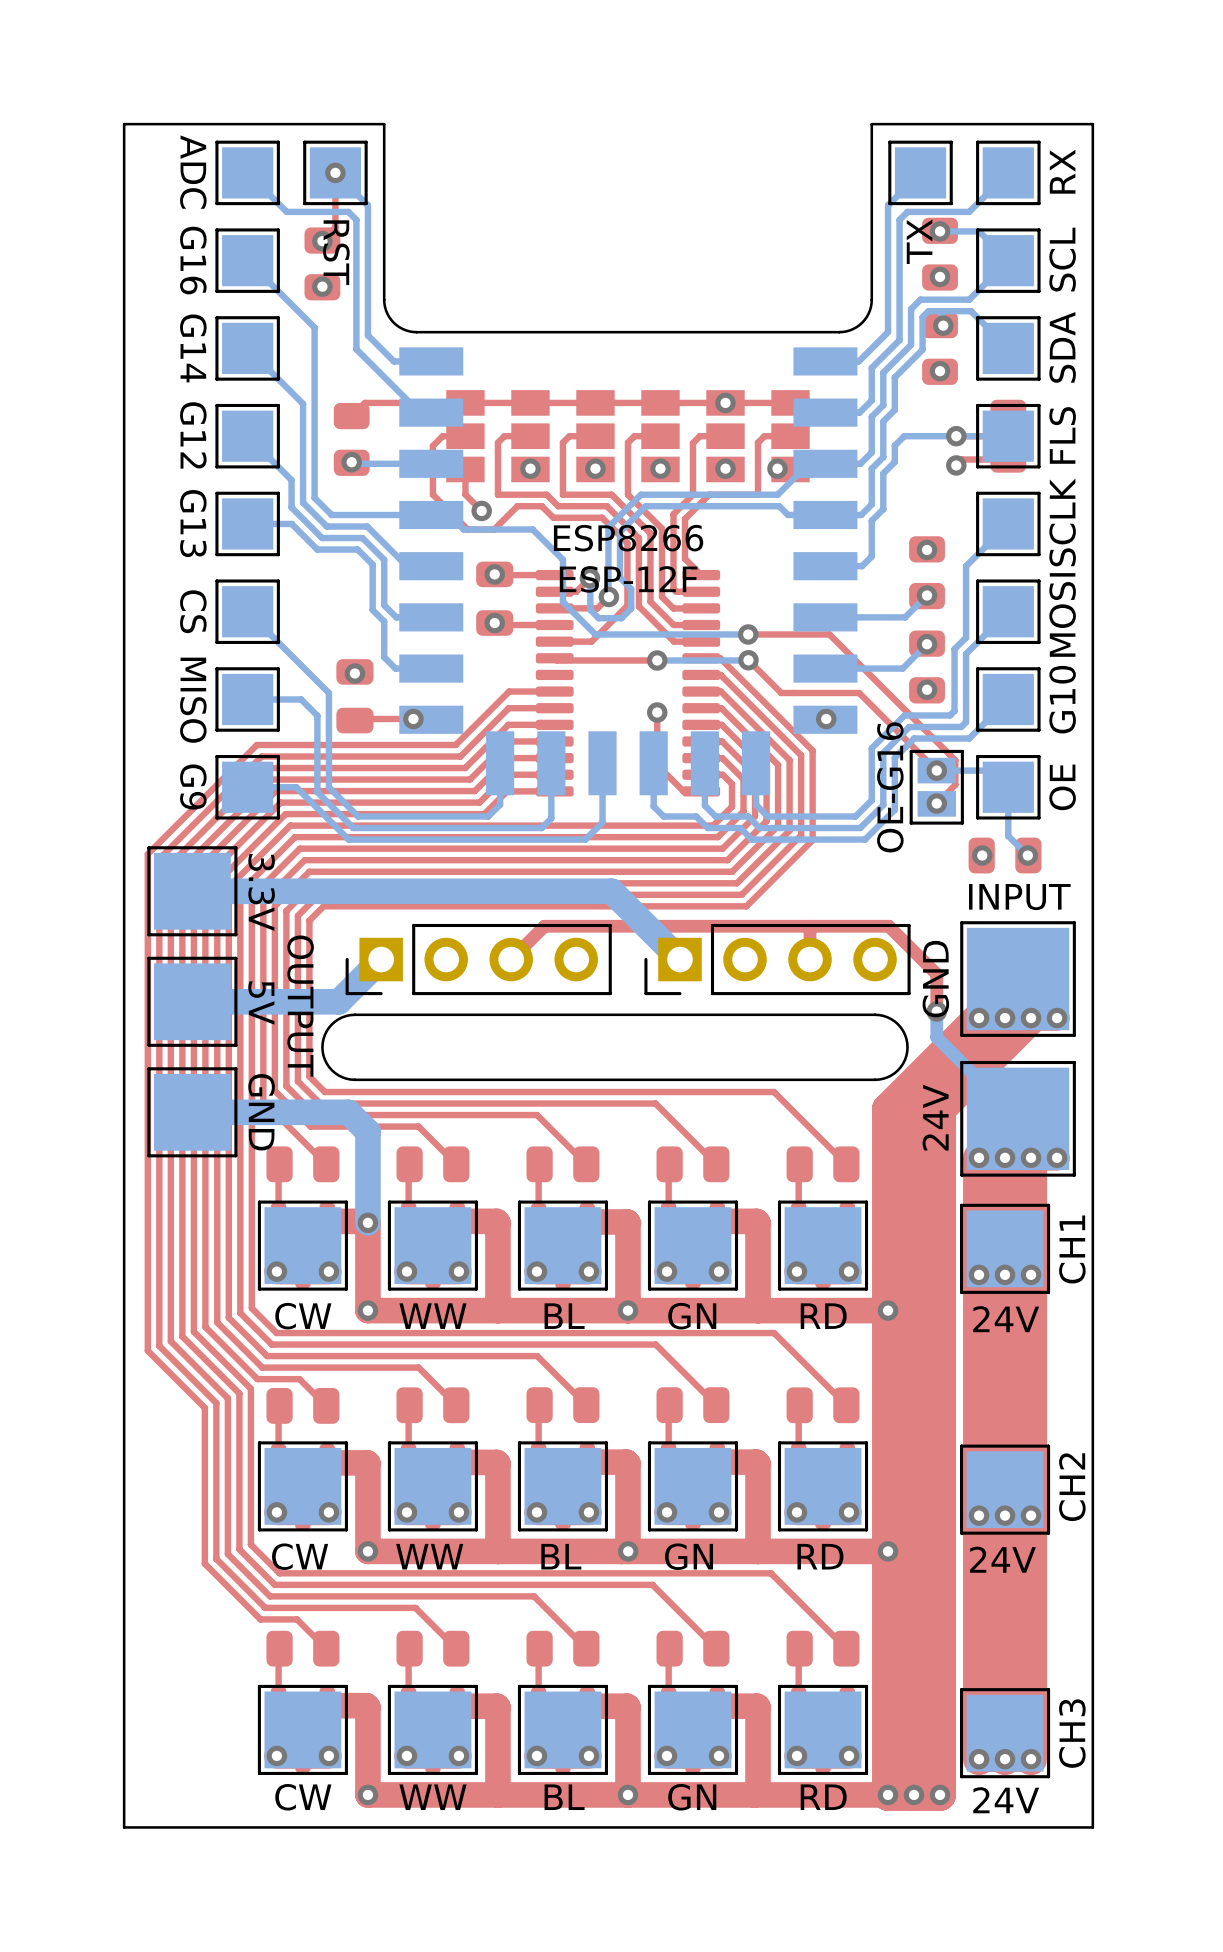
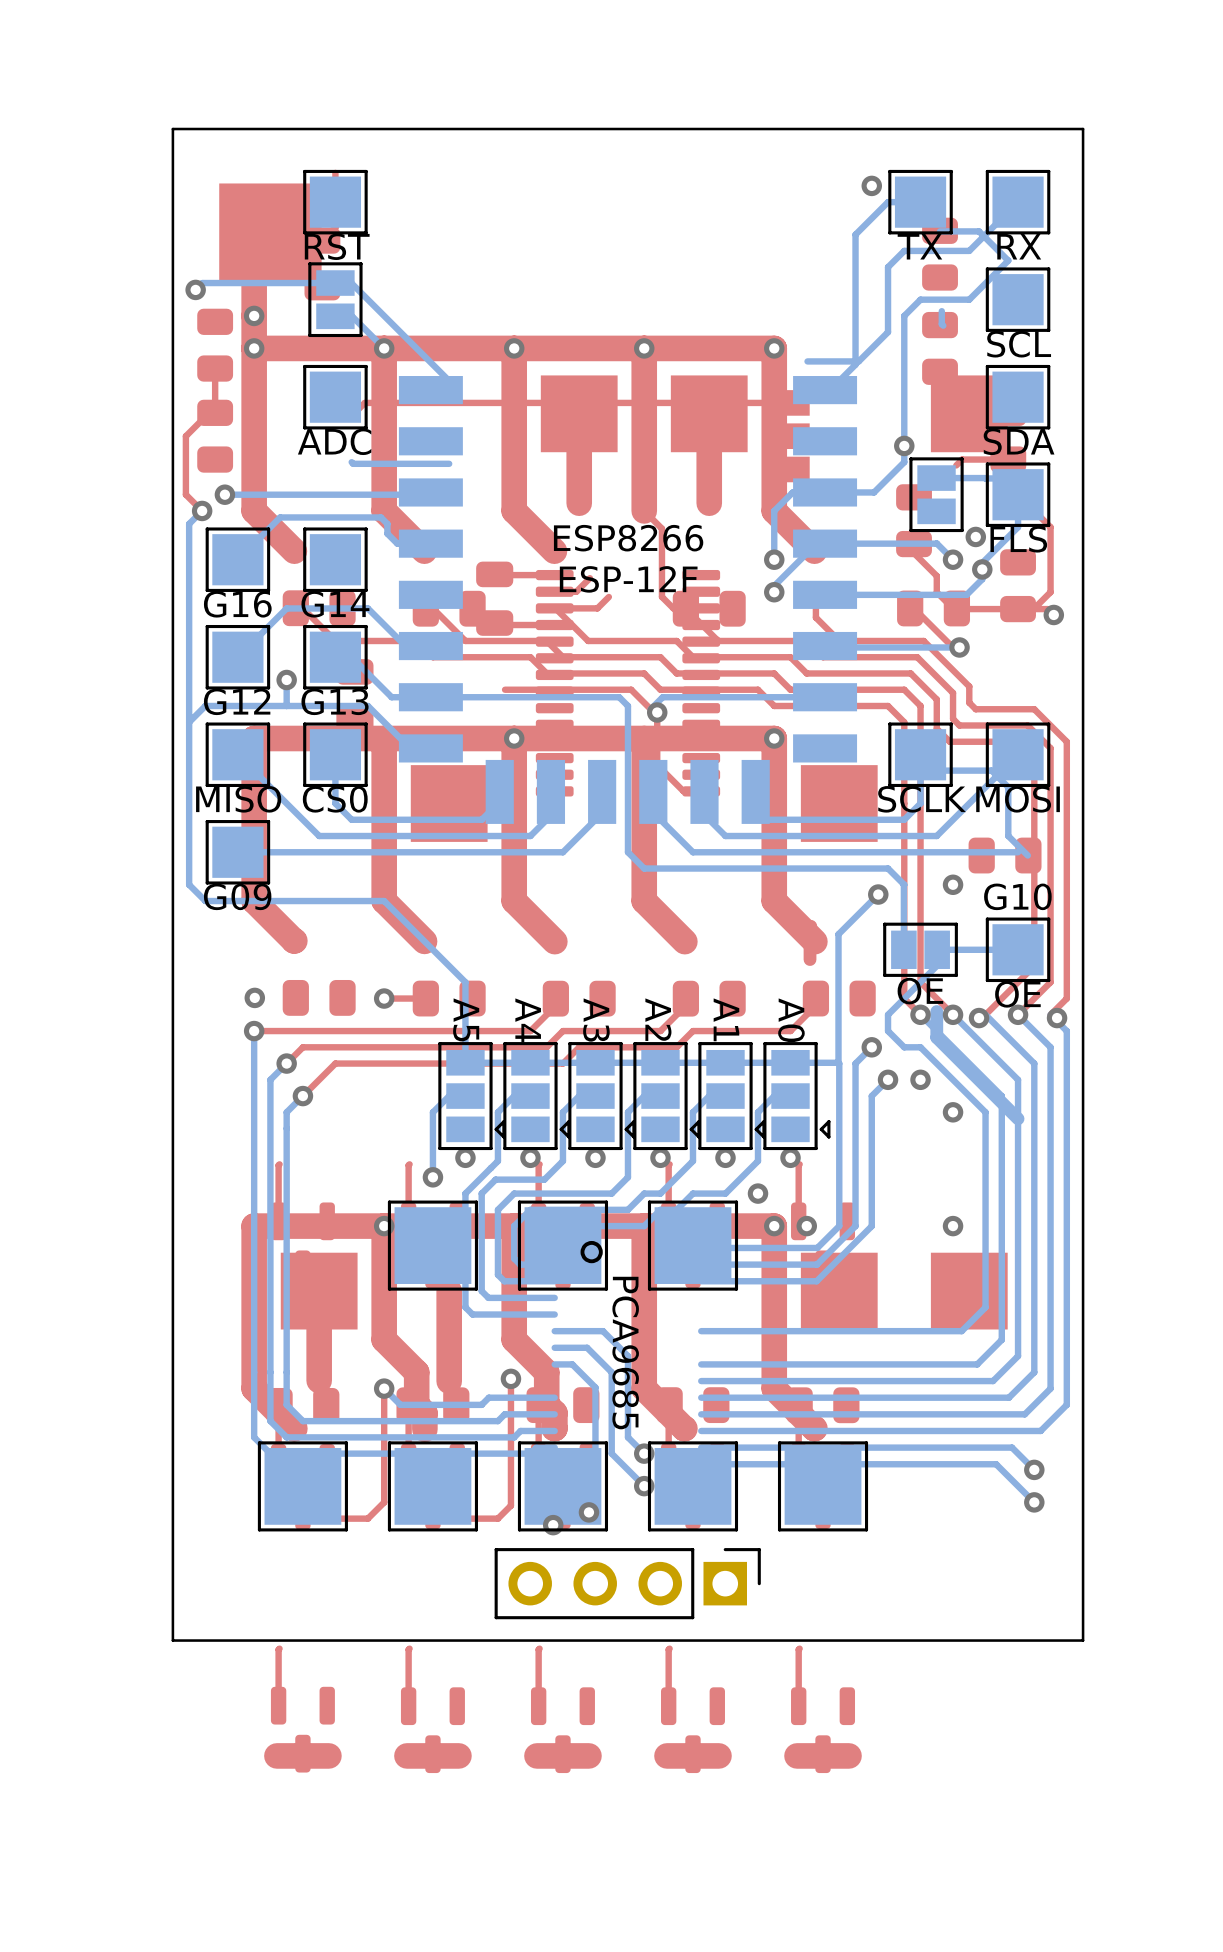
board edge: (1092, 124) (871, 124) (871, 303) (868, 313) (862, 322) (850, 330) (839, 332) (416, 332) (405, 330) (391, 319) (384, 303) (384, 124) (124, 124) (124, 1827) (1092, 1827) (1092, 124) -> (1083, 129) (1083, 1640) (172, 1640) (172, 129) (1083, 129)
text rotation: 0° (1062, 171) -> 90° clockwise (1019, 246)
text position: RX (1062, 171) -> RX (1019, 246)
text rotation: 0° (193, 172) -> 90° counterclockwise (334, 441)
text position: ADC (193, 172) -> ADC (334, 441)
bottom track: (247, 172) (286, 211) (348, 211) (356, 219) (356, 349) (419, 412) (449, 412) -> none
part: (247, 172) -> none
bottom track: (335, 172) (367, 205) (367, 335) (393, 361) (449, 361) -> none
part position: (335, 172) -> (335, 202)
via: (335, 172) -> none
bottom track: (920, 172) (888, 205) (888, 267) -> (1018, 202) (969, 250) (904, 250) (888, 267)
part position: (920, 172) -> (920, 202)
bottom track: (1008, 172) (969, 211) (907, 211) (899, 219) (899, 340) (871, 367) (871, 400) (859, 412) (807, 412) -> none
part: (1008, 172) -> none
via: none -> (871, 185)
bottom track: none -> (920, 202) (888, 202) (855, 234) (855, 364) (830, 390) (807, 390)
part: none -> (1018, 202)
via: (940, 231) -> none
top track: none -> (270, 234) (254, 250) (254, 510) (294, 551)
part: none -> (270, 234)
via: (322, 241) -> none
text rotation: 0° (919, 241) -> 90° clockwise (919, 246)
text rotation: 0° (336, 252) -> 90° counterclockwise (337, 246)
text rotation: 0° (1062, 259) -> 90° clockwise (1019, 344)
text position: SCL (1062, 259) -> SCL (1019, 344)
text rotation: 0° (193, 260) -> 90° counterclockwise (237, 604)
text position: G16 (193, 260) -> G16 (237, 604)
bottom track: (247, 260) (314, 327) (314, 497) (331, 515) (449, 515) (463, 529) (532, 529) (562, 559) (562, 601) (595, 634) (748, 634) -> none
part: (247, 260) -> none
part: (1008, 260) -> none
via: (940, 276) -> none
via: (322, 286) -> none
bottom track: none -> (195, 289) (202, 283) (351, 283) (448, 380) (448, 390)
via: none -> (195, 289)
part: none -> (335, 299)
part: none -> (1018, 299)
bottom track: (911, 309) (911, 344) (883, 372) (883, 405) (871, 416) (871, 452) (860, 463) (807, 463) (777, 494) (640, 494) (608, 527) (608, 596) -> (911, 309) (904, 315) (904, 462) (874, 492) (792, 492) (774, 510) (774, 559)
via: none -> (254, 315)
bottom track: none -> (335, 316) (352, 316) (384, 348)
via: (943, 325) -> none
part: none -> (215, 345)
text rotation: 0° (1062, 347) -> 90° clockwise (1019, 441)
text position: SDA (1062, 347) -> SDA (1019, 441)
text rotation: 0° (193, 348) -> 90° counterclockwise (335, 604)
text position: G14 (193, 348) -> G14 (335, 604)
bottom track: (247, 348) (303, 403) (303, 502) (326, 526) (367, 526) (406, 566) (449, 566) -> none
part: (247, 348) -> none
top track: none -> (254, 348) (774, 348) (774, 510) (814, 551)
via: none -> (254, 348)
top track: none -> (384, 348) (384, 510) (424, 551)
via: none -> (384, 348)
top track: none -> (514, 348) (514, 510) (554, 551)
via: none -> (514, 348)
via: none -> (644, 348)
via: none -> (774, 348)
bottom track: (1008, 348) (971, 311) (928, 311) (922, 317) (922, 349) (894, 377) (894, 409) (883, 421) (883, 457) (871, 468) (871, 504) (861, 515) (788, 515) (779, 506) (645, 506) (619, 531) (619, 577) (631, 588) (631, 608) (621, 618) (598, 618) (590, 609) (589, 578) -> none
part: (1008, 348) -> none
top track: none -> (215, 368) (215, 412) (209, 412) (185, 436) (185, 494) (202, 510)
via: (940, 371) -> none
part: none -> (335, 397)
part: none -> (1018, 397)
via: (725, 402) -> none
top track: none -> (579, 413) (579, 503)
part: none -> (579, 413)
top track: none -> (709, 413) (709, 503)
part: none -> (709, 413)
part: none -> (969, 413)
text rotation: 0° (193, 435) -> 90° counterclockwise (237, 701)
text position: G12 (193, 435) -> G12 (237, 701)
text rotation: 0° (1062, 435) -> 90° clockwise (1018, 539)
text position: FLS (1062, 435) -> FLS (1018, 539)
part: none -> (215, 436)
bottom track: (247, 436) (291, 480) (291, 507) (322, 538) (362, 538) (384, 559) (384, 605) (396, 617) (449, 617) -> none
part: (247, 436) -> none
top track: (465, 436) (442, 436) (432, 445) (432, 494) (467, 529) (494, 529) (517, 506) (541, 506) (553, 517) (602, 517) (627, 543) (627, 605) (591, 641) (554, 641) -> none
part: (465, 436) -> none
top track: (530, 436) (504, 436) (497, 442) (497, 494) (546, 494) (558, 506) (606, 506) (638, 538) (638, 606) (674, 641) (701, 641) -> none
part: (530, 436) -> none
top track: (595, 436) (569, 436) (562, 442) (562, 494) (611, 494) (650, 533) (650, 601) (673, 625) (701, 625) -> none
part: (595, 436) -> none
top track: (660, 436) (634, 436) (627, 442) (627, 494) (644, 510) -> (644, 348) (644, 510)
part: (660, 436) -> none
top track: (725, 436) (699, 436) (692, 443) (692, 494) (673, 514) (673, 588) (676, 591) (701, 591) -> none
part: (725, 436) -> none
top track: (790, 436) (764, 436) (758, 442) (758, 494) (709, 494) (685, 518) (685, 558) (701, 575) -> none
via: (956, 436) -> none
bottom track: (1008, 436) (904, 436) (894, 445) (894, 461) (883, 473) (883, 509) (871, 520) (871, 556) (862, 566) (807, 566) -> none
part: (1008, 436) -> none
part: (351, 439) -> none
via: none -> (904, 445)
via: (351, 462) -> none
via: (956, 465) -> none
via: (530, 468) -> none
via: (595, 468) -> none
via: (660, 468) -> none
via: (725, 468) -> none
via: (777, 468) -> none
top track: (465, 469) (465, 494) (481, 510) -> none
bottom track: none -> (936, 478) (1001, 478) (1018, 494) (1018, 527) (982, 562) (982, 579) (966, 594) (807, 594)
bottom track: none -> (448, 492) (446, 494) (224, 494)
via: none -> (224, 494)
part: none -> (936, 494)
part: none -> (1018, 494)
top track: none -> (1012, 497) (1021, 497) (1050, 527) (1050, 592) (1033, 609)
bottom track: none -> (202, 510) (189, 523) (189, 884) (205, 901) (384, 901) (465, 982) (465, 1062) (838, 1062)
via: none -> (202, 510)
via: (481, 510) -> none
part: none -> (914, 520)
text rotation: 0° (1062, 522) -> 90° clockwise (922, 799)
text position: SCLK (1062, 522) -> SCLK (922, 799)
text rotation: 0° (193, 523) -> 90° counterclockwise (335, 701)
text position: G13 (193, 523) -> G13 (335, 701)
bottom track: (247, 523) (291, 523) (317, 549) (357, 549) (372, 564) (372, 609) (384, 621) (384, 657) (395, 668) (449, 668) -> none
part: (247, 523) -> none
bottom track: (1008, 523) (966, 566) (966, 637) (954, 649) (954, 711) (950, 715) (904, 715) (871, 748) (871, 800) (855, 816) (767, 816) (756, 804) (756, 745) -> none
part: (1008, 523) -> none
via: none -> (975, 536)
bottom track: none -> (448, 543) (397, 543) (387, 533) (387, 523) (380, 517) (280, 517) (237, 559)
top track: none -> (914, 544) (914, 553) (936, 575) (936, 592) (953, 608) (1047, 609) (1053, 614)
via: (927, 549) -> none
part: none -> (237, 559)
part: none -> (335, 559)
via: none -> (774, 559)
bottom track: none -> (953, 559) (936, 543) (807, 543) (807, 553) (774, 585) (774, 592)
via: none -> (953, 559)
via: none -> (982, 569)
part position: (628, 571) -> (627, 599)
part: (927, 572) -> none
via: (494, 574) -> none
via: (589, 578) -> none
part: none -> (1018, 585)
via: none -> (774, 592)
bottom track: (927, 595) (905, 617) (807, 617) -> none
via: (927, 595) -> none
via: (608, 596) -> none
top track: none -> (295, 608) (302, 608) (335, 640) (416, 640) (432, 657) (530, 657) (546, 673) (644, 673) (660, 689) (758, 689) (774, 705) (888, 705) (904, 722) (904, 998) (920, 1014)
part: none -> (319, 608)
top track: none -> (425, 608) (433, 608) (465, 640) (546, 640) (562, 657) (660, 657) (676, 673) (774, 673) (790, 689) (904, 689) (920, 705) (920, 982) (953, 1014)
part: none -> (449, 608)
top track: none -> (555, 608) (588, 640) (676, 640) (692, 657) (790, 657) (806, 673) (910, 673) (936, 699) (936, 728) (949, 741) (1024, 741) (1034, 751) (1034, 966) (985, 1014)
top track: none -> (685, 608) (718, 640) (806, 640) (823, 657) (917, 657) (953, 692) (953, 718) (959, 725) (1027, 725) (1050, 748) (1050, 982) (1018, 1014)
part: none -> (709, 608)
top track: none -> (815, 608) (815, 617) (839, 640) (923, 640) (969, 686) (969, 702) (975, 709) (1034, 709) (1066, 741) (1066, 998) (1050, 1014)
top track: none -> (910, 608) (914, 608) (949, 644) (956, 644) (959, 647)
part: none -> (933, 608)
text: CS (193, 611) -> none
bottom track: (247, 611) (328, 692) (328, 787) (358, 816) (488, 816) (500, 804) (500, 745) -> none
part: (247, 611) -> none
bottom track: (1008, 611) (966, 653) (966, 722) (961, 726) (909, 726) (883, 753) (883, 805) (860, 828) (759, 828) (748, 816) (715, 816) (704, 805) (704, 745) -> none
part: (1008, 611) -> none
via: none -> (1053, 614)
text rotation: 0° (1062, 614) -> 90° clockwise (1018, 799)
text position: MOSI (1062, 614) -> MOSI (1018, 799)
via: (494, 623) -> none
top track: (748, 634) (829, 634) (955, 760) (955, 784) (936, 803) -> none
via: (748, 634) -> none
bottom track: (927, 644) (902, 668) (807, 668) -> none
via: (927, 644) -> none
bottom track: none -> (448, 646) (405, 646) (367, 608) (286, 608) (237, 657)
bottom track: none -> (807, 646) (959, 647)
via: none -> (959, 647)
part: none -> (237, 657)
bottom track: none -> (335, 657) (351, 657) (391, 697) (619, 697) (627, 705) (627, 852) (644, 868) (888, 868) (904, 884) (903, 949)
part: none -> (335, 657)
top track: (554, 658) (556, 660) (657, 660) -> none
top track: (701, 658) (720, 658) (812, 750) (812, 840) (746, 906) (323, 906) (309, 920) (309, 1076) (324, 1092) (774, 1092) (846, 1164) -> none
via: (657, 660) -> none
top track: (748, 660) (781, 692) (859, 692) (936, 770) -> none
bottom track: (748, 660) (657, 660) -> none
via: (748, 660) -> none
part: (927, 666) -> none
via: (354, 673) -> none
top track: (701, 674) (720, 674) (801, 755) (801, 835) (741, 894) (318, 894) (297, 915) (297, 1081) (320, 1103) (655, 1103) (716, 1164) -> none
bottom track: none -> (286, 679) (286, 705)
via: none -> (286, 679)
top track: none -> (505, 689) (631, 689) (650, 709)
via: (927, 689) -> none
top track: (554, 691) (509, 691) (455, 745) (256, 745) (147, 854) (147, 1350) (204, 1407) (204, 1563) (260, 1619) (297, 1619) (326, 1648) -> none
top track: (701, 691) (720, 691) (789, 760) (789, 830) (736, 883) (314, 883) (286, 910) (286, 1086) (315, 1115) (537, 1115) (586, 1164) -> none
bottom track: none -> (807, 697) (662, 697) (650, 709)
bottom track: (247, 699) (301, 699) (317, 715) (317, 792) (353, 828) (541, 828) (551, 818) (551, 745) -> none
part: (247, 699) -> none
bottom track: (1008, 699) (969, 738) (914, 738) (894, 757) (894, 809) (865, 839) (751, 839) (740, 828) (707, 828) (696, 816) (663, 816) (653, 806) (653, 745) -> none
part: (1008, 699) -> none
text: G10 (1062, 699) -> none
text rotation: 0° (193, 700) -> 90° counterclockwise (238, 799)
top track: (554, 708) (508, 708) (460, 756) (261, 756) (159, 858) (159, 1346) (216, 1403) (216, 1558) (265, 1607) (415, 1607) (456, 1648) -> none
top track: (701, 708) (721, 708) (778, 764) (778, 825) (732, 871) (309, 871) (274, 906) (274, 1090) (310, 1126) (418, 1126) (456, 1164) -> none
top track: (413, 718) (356, 718) (354, 720) -> none
via: (413, 718) -> none
via: (826, 718) -> none
bottom track: none -> (189, 722) (205, 705) (367, 705) (410, 748) (448, 748)
top track: (554, 724) (508, 724) (465, 768) (266, 768) (170, 863) (170, 1341) (227, 1398) (227, 1554) (270, 1596) (534, 1596) (586, 1648) -> none
top track: (701, 724) (721, 724) (766, 769) (766, 821) (727, 860) (304, 860) (263, 901) (263, 1101) (326, 1164) -> none
top track: none -> (384, 738) (384, 901) (424, 941)
top track: none -> (514, 738) (514, 901) (554, 941)
via: none -> (514, 738)
top track: none -> (644, 738) (644, 901) (684, 941)
via: none -> (774, 738)
top track: (554, 741) (508, 741) (470, 779) (271, 779) (182, 868) (182, 1336) (239, 1393) (239, 1549) (274, 1584) (652, 1584) (716, 1648) -> none
top track: (701, 741) (722, 741) (755, 774) (755, 816) (722, 848) (299, 848) (251, 896) (251, 1308) (276, 1333) (774, 1333) (846, 1405) -> none
bottom track: (602, 745) (602, 822) (585, 839) (348, 839) (296, 787) (247, 787) -> none
bottom track: none -> (237, 754) (319, 836) (530, 836) (550, 815) (550, 774)
part: none -> (237, 754)
bottom track: none -> (335, 754) (335, 803) (351, 819) (481, 819) (499, 801) (499, 774)
part: none -> (335, 754)
bottom track: none -> (920, 754) (920, 803) (904, 819) (758, 819) (755, 817) (755, 774)
part: none -> (920, 754)
bottom track: none -> (1018, 754) (936, 836) (725, 836) (704, 815) (704, 774)
part: none -> (1018, 754)
top track: (554, 758) (507, 758) (474, 791) (275, 791) (193, 873) (193, 1331) (250, 1388) (250, 1544) (279, 1573) (771, 1573) (846, 1648) -> none
top track: (701, 758) (722, 758) (743, 779) (743, 811) (717, 837) (295, 837) (240, 891) (240, 1313) (271, 1344) (655, 1344) (716, 1405) -> none
via: (936, 770) -> none
top track: (554, 774) (507, 774) (479, 802) (280, 802) (205, 877) (205, 1327) (257, 1379) (299, 1379) (326, 1405) -> none
bottom track: none -> (602, 774) (602, 813) (562, 852) (237, 852)
bottom track: none -> (653, 774) (653, 812) (692, 852) (1018, 852)
top track: (701, 774) (722, 774) (732, 784) (732, 806) (713, 825) (290, 825) (228, 887) (228, 1317) (267, 1356) (537, 1356) (586, 1405) -> none
text: G9 (193, 787) -> none
part: (247, 787) -> none
text: OE-G16 (890, 787) -> none
part: (936, 787) -> none
part: (1008, 787) -> none
text: OE (1062, 787) -> none
top track: (554, 791) (507, 791) (484, 814) (285, 814) (217, 882) (217, 1322) (262, 1367) (418, 1367) (456, 1405) -> none
text: none -> CS0 (335, 799)
part: none -> (449, 803)
part: none -> (839, 803)
via: (936, 803) -> none
part: none -> (237, 852)
via: (982, 855) -> none
via: (1027, 855) -> none
via: none -> (953, 884)
bottom track: (192, 891) (611, 891) (679, 959) -> none
part: (192, 891) -> none
text: 3.3V (261, 892) -> G09 (237, 896)
bottom track: none -> (878, 894) (838, 934) (838, 1062)
via: none -> (878, 894)
text: INPUT (1019, 897) -> G10 (1017, 896)
top track: none -> (294, 940) (254, 901) (254, 738) (774, 738) (774, 901) (814, 941)
part: none -> (920, 949)
bottom track: none -> (1018, 949) (937, 949) (937, 965) (888, 1014) (888, 1031) (904, 1047) (920, 1047) (985, 1112) (985, 1307) (961, 1331) (701, 1331)
part: none -> (1018, 949)
bottom track: (381, 959) (338, 1001) (192, 1001) -> none
part: (478, 959) -> none
top track: (511, 959) (544, 926) (888, 926) (936, 974) (936, 1011) -> none
part: (777, 959) -> none
text: GND (935, 979) -> OE (920, 991)
part: (1018, 979) -> none
text: none -> OE (1017, 994)
via: none -> (254, 997)
part: none -> (319, 997)
via: none -> (384, 998)
top track: none -> (425, 998) (384, 998)
part: none -> (449, 998)
top track: none -> (555, 998) (555, 1005) (530, 1031) (254, 1031)
part: none -> (579, 998)
top track: none -> (685, 998) (685, 1005) (660, 1031) (562, 1031) (546, 1047) (302, 1047) (286, 1063)
part: none -> (709, 998)
top track: none -> (815, 998) (815, 1005) (790, 1031) (692, 1031) (676, 1047) (579, 1047) (562, 1063) (335, 1063) (302, 1096)
part: none -> (839, 998)
part: (192, 1001) -> none
text: 5V (261, 1003) -> none
text: OUTPUT (300, 1006) -> none
via: (936, 1011) -> none
board edge: (875, 1014) (354, 1014) (342, 1017) (331, 1024) (324, 1034) (322, 1047) (324, 1059) (331, 1070) (342, 1077) (354, 1079) (875, 1079) (887, 1077) (898, 1070) (905, 1059) (907, 1047) (905, 1034) (898, 1024) (887, 1017) (875, 1014) -> none
bottom track: none -> (920, 1014) (1001, 1096) (1001, 1339) (977, 1364) (701, 1364)
via: none -> (920, 1014)
bottom track: none -> (953, 1014) (1018, 1079) (1018, 1356) (993, 1381) (701, 1381)
via: none -> (953, 1014)
bottom track: none -> (985, 1014) (1034, 1063) (1034, 1372) (1008, 1397) (701, 1397)
bottom track: none -> (1018, 1014) (1050, 1047) (1050, 1388) (1024, 1414) (701, 1414)
via: none -> (1018, 1014)
bottom track: none -> (1050, 1014) (1066, 1031) (1066, 1404) (1040, 1430) (701, 1430)
top track: (1005, 1018) (914, 1109) (914, 1794) -> none
via: (1005, 1018) -> none
top track: (1031, 1018) (940, 1109) (940, 1794) (888, 1794) -> none
via: (1031, 1018) -> none
top track: (1057, 1018) (979, 1018) (888, 1109) (888, 1794) -> none
text: none -> A5 (466, 1019)
text: none -> A2 (658, 1019)
text: none -> A1 (726, 1019)
text: none -> A4 (528, 1020)
text: none -> A3 (596, 1020)
text: none -> A0 (791, 1020)
bottom track: none -> (254, 1031) (254, 1437) (270, 1453) (530, 1453) (536, 1447) (554, 1447)
via: none -> (254, 1031)
bottom track: none -> (871, 1047) (855, 1063) (855, 1226) (817, 1264) (701, 1264)
via: none -> (871, 1047)
bottom track: none -> (838, 1062) (839, 1226) (817, 1247) (701, 1247)
bottom track: none -> (286, 1063) (270, 1079) (270, 1421) (286, 1437) (514, 1437) (520, 1430) (554, 1430)
via: none -> (286, 1063)
bottom track: none -> (888, 1079) (871, 1096) (871, 1226) (816, 1281) (701, 1281)
via: none -> (888, 1079)
via: none -> (920, 1079)
bottom track: none -> (302, 1096) (286, 1112) (286, 1404) (302, 1421) (497, 1421) (504, 1414) (554, 1414)
via: none -> (302, 1096)
bottom track: none -> (465, 1096) (449, 1096) (432, 1112) (432, 1177)
part: none -> (471, 1096)
bottom track: none -> (530, 1096) (514, 1096) (497, 1112) (497, 1161) (465, 1193) (465, 1307) (472, 1314) (554, 1314)
part: none -> (536, 1096)
bottom track: none -> (595, 1096) (579, 1096) (562, 1112) (562, 1161) (544, 1179) (495, 1179) (481, 1193) (481, 1291) (488, 1297) (554, 1297)
part: none -> (601, 1096)
bottom track: none -> (660, 1096) (644, 1096) (627, 1112) (627, 1177) (611, 1193) (514, 1193) (497, 1209) (497, 1274) (504, 1281) (554, 1281)
part: none -> (666, 1096)
bottom track: none -> (725, 1096) (709, 1096) (692, 1112) (692, 1161) (660, 1193) (644, 1193) (627, 1209) (530, 1209) (514, 1226) (514, 1258) (520, 1264) (554, 1264)
part: none -> (731, 1096)
bottom track: none -> (790, 1096) (774, 1096) (758, 1112) (758, 1161) (725, 1193) (692, 1193) (676, 1209) (660, 1209) (644, 1226) (546, 1226) (530, 1242) (536, 1247) (554, 1247)
part: none -> (796, 1096)
bottom track: (192, 1112) (348, 1112) (367, 1131) (367, 1222) -> none
part: (192, 1112) -> none
text: GND (261, 1112) -> none
via: none -> (953, 1112)
text: 24V (935, 1117) -> none
part: (1018, 1118) -> none
via: none -> (465, 1157)
via: none -> (530, 1157)
via: none -> (595, 1157)
via: none -> (660, 1157)
via: none -> (725, 1157)
via: none -> (790, 1157)
via: (979, 1157) -> none
top track: (1005, 1157) (1005, 1759) -> none
via: (1005, 1157) -> none
via: (1031, 1157) -> none
top track: (1057, 1157) (979, 1157) (979, 1759) (1031, 1759) (1031, 1157) -> none
via: (1057, 1157) -> none
part: (302, 1164) -> none
part: (432, 1164) -> none
part: (562, 1164) -> none
part: (692, 1164) -> none
part: (823, 1164) -> none
via: none -> (432, 1177)
via: none -> (758, 1193)
top track: (327, 1221) (367, 1222) (367, 1310) (888, 1310) -> none
top track: (457, 1221) (497, 1222) (497, 1310) -> none
top track: (587, 1221) (627, 1222) (627, 1310) -> none
top track: (717, 1221) (758, 1222) (758, 1310) -> none
via position: (367, 1222) -> (384, 1226)
top track: none -> (384, 1226) (384, 1339) (416, 1372) (416, 1404) (424, 1413) (424, 1429)
top track: none -> (514, 1226) (514, 1339) (546, 1372) (546, 1404) (554, 1413) (554, 1428)
top track: none -> (644, 1226) (644, 1388) (684, 1428)
via: none -> (774, 1226)
via: none -> (806, 1226)
via: none -> (953, 1226)
drawing: none -> [580, 1240, 603, 1264]
part side: bottom (302, 1245) -> top (319, 1291)
part side: bottom (823, 1245) -> top (839, 1291)
part side: bottom (1005, 1248) -> top (969, 1291)
text: CH1 (1072, 1249) -> none
via: (276, 1271) -> none
via: (328, 1271) -> none
via: (406, 1271) -> none
via: (458, 1271) -> none
via: (536, 1271) -> none
via: (588, 1271) -> none
via: (666, 1271) -> none
via: (718, 1271) -> none
via: (797, 1271) -> none
via: (849, 1271) -> none
via: (979, 1274) -> none
via: (1005, 1274) -> none
via: (1031, 1274) -> none
top track: none -> (319, 1291) (319, 1380)
top track: none -> (449, 1291) (449, 1381)
via: (367, 1310) -> none
via: (627, 1310) -> none
via: (888, 1310) -> none
text: CW (303, 1316) -> none
text: WW (432, 1316) -> none
text: BL (564, 1316) -> none
text: GN (692, 1316) -> none
text: RD (823, 1316) -> none
text: 24V (1006, 1319) -> none
bottom track: none -> (554, 1331) (603, 1331) (627, 1356) (627, 1437) (644, 1453)
bottom track: none -> (554, 1347) (587, 1347) (611, 1372) (611, 1453) (644, 1486)
text: none -> PCA9685 (625, 1353)
bottom track: none -> (554, 1364) (572, 1364) (595, 1387) (595, 1486) (579, 1502) (579, 1518)
top track: none -> (510, 1378) (510, 1505) (497, 1518) (449, 1518) (425, 1495) (425, 1486)
via: none -> (510, 1378)
top track: none -> (384, 1388) (384, 1502) (367, 1518) (319, 1518) (295, 1495) (295, 1485)
bottom track: none -> (384, 1388) (400, 1404) (481, 1404) (488, 1397) (554, 1397)
via: none -> (384, 1388)
top track: none -> (814, 1428) (774, 1388) (774, 1226) (254, 1226) (254, 1388) (294, 1428)
bottom track: none -> (701, 1447) (1012, 1447) (1034, 1469)
via: none -> (644, 1453)
top track: (327, 1462) (367, 1463) (367, 1551) (888, 1551) -> none
top track: (457, 1462) (497, 1463) (497, 1551) -> none
top track: (587, 1462) (627, 1463) (627, 1544) (621, 1551) -> none
top track: (717, 1462) (758, 1463) (758, 1551) -> none
bottom track: none -> (701, 1464) (996, 1464) (1034, 1502)
via: none -> (1034, 1469)
via: none -> (644, 1486)
text: CH2 (1072, 1487) -> none
part: (1005, 1489) -> none
via: (276, 1512) -> none
via: (328, 1512) -> none
via: (406, 1512) -> none
via: (458, 1512) -> none
via position: (536, 1512) -> (553, 1525)
via: (666, 1512) -> none
via: (718, 1512) -> none
via: (797, 1512) -> none
via: (849, 1512) -> none
via: (979, 1515) -> none
via: (1005, 1515) -> none
via position: (1031, 1515) -> (1034, 1502)
via: (367, 1551) -> none
via: (628, 1551) -> none
via: (888, 1551) -> none
text: CW (300, 1556) -> none
text: WW (429, 1556) -> none
text: BL (561, 1556) -> none
text: GN (689, 1556) -> none
text: RD (820, 1556) -> none
text: 24V (1002, 1559) -> none
part: none -> (627, 1583)
part: (302, 1648) -> none
part: (432, 1648) -> none
part: (562, 1648) -> none
part: (692, 1648) -> none
part: (823, 1648) -> none
top track: (327, 1705) (367, 1707) (367, 1794) (888, 1794) -> none
top track: (457, 1706) (497, 1707) (497, 1794) -> none
top track: (587, 1706) (627, 1707) (627, 1794) -> none
top track: (717, 1706) (758, 1707) (758, 1791) (754, 1794) -> none
part: (302, 1729) -> none
part: (432, 1729) -> none
part: (562, 1729) -> none
part: (692, 1729) -> none
part: (823, 1729) -> none
part: (1005, 1733) -> none
text: CH3 (1072, 1733) -> none
via: (276, 1755) -> none
via: (328, 1755) -> none
via: (406, 1755) -> none
via: (458, 1755) -> none
via: (536, 1755) -> none
via: (588, 1755) -> none
via: (666, 1755) -> none
via: (718, 1755) -> none
via: (797, 1755) -> none
via: (849, 1755) -> none
via: (979, 1759) -> none
via: (1005, 1759) -> none
via: (1031, 1759) -> none
via: (367, 1794) -> none
via: (627, 1794) -> none
via: (888, 1794) -> none
via: (914, 1794) -> none
via: (940, 1794) -> none
text: CW (303, 1797) -> none
text: WW (432, 1797) -> none
text: BL (564, 1797) -> none
text: GN (692, 1797) -> none
text: RD (823, 1797) -> none
text: 24V (1006, 1800) -> none

